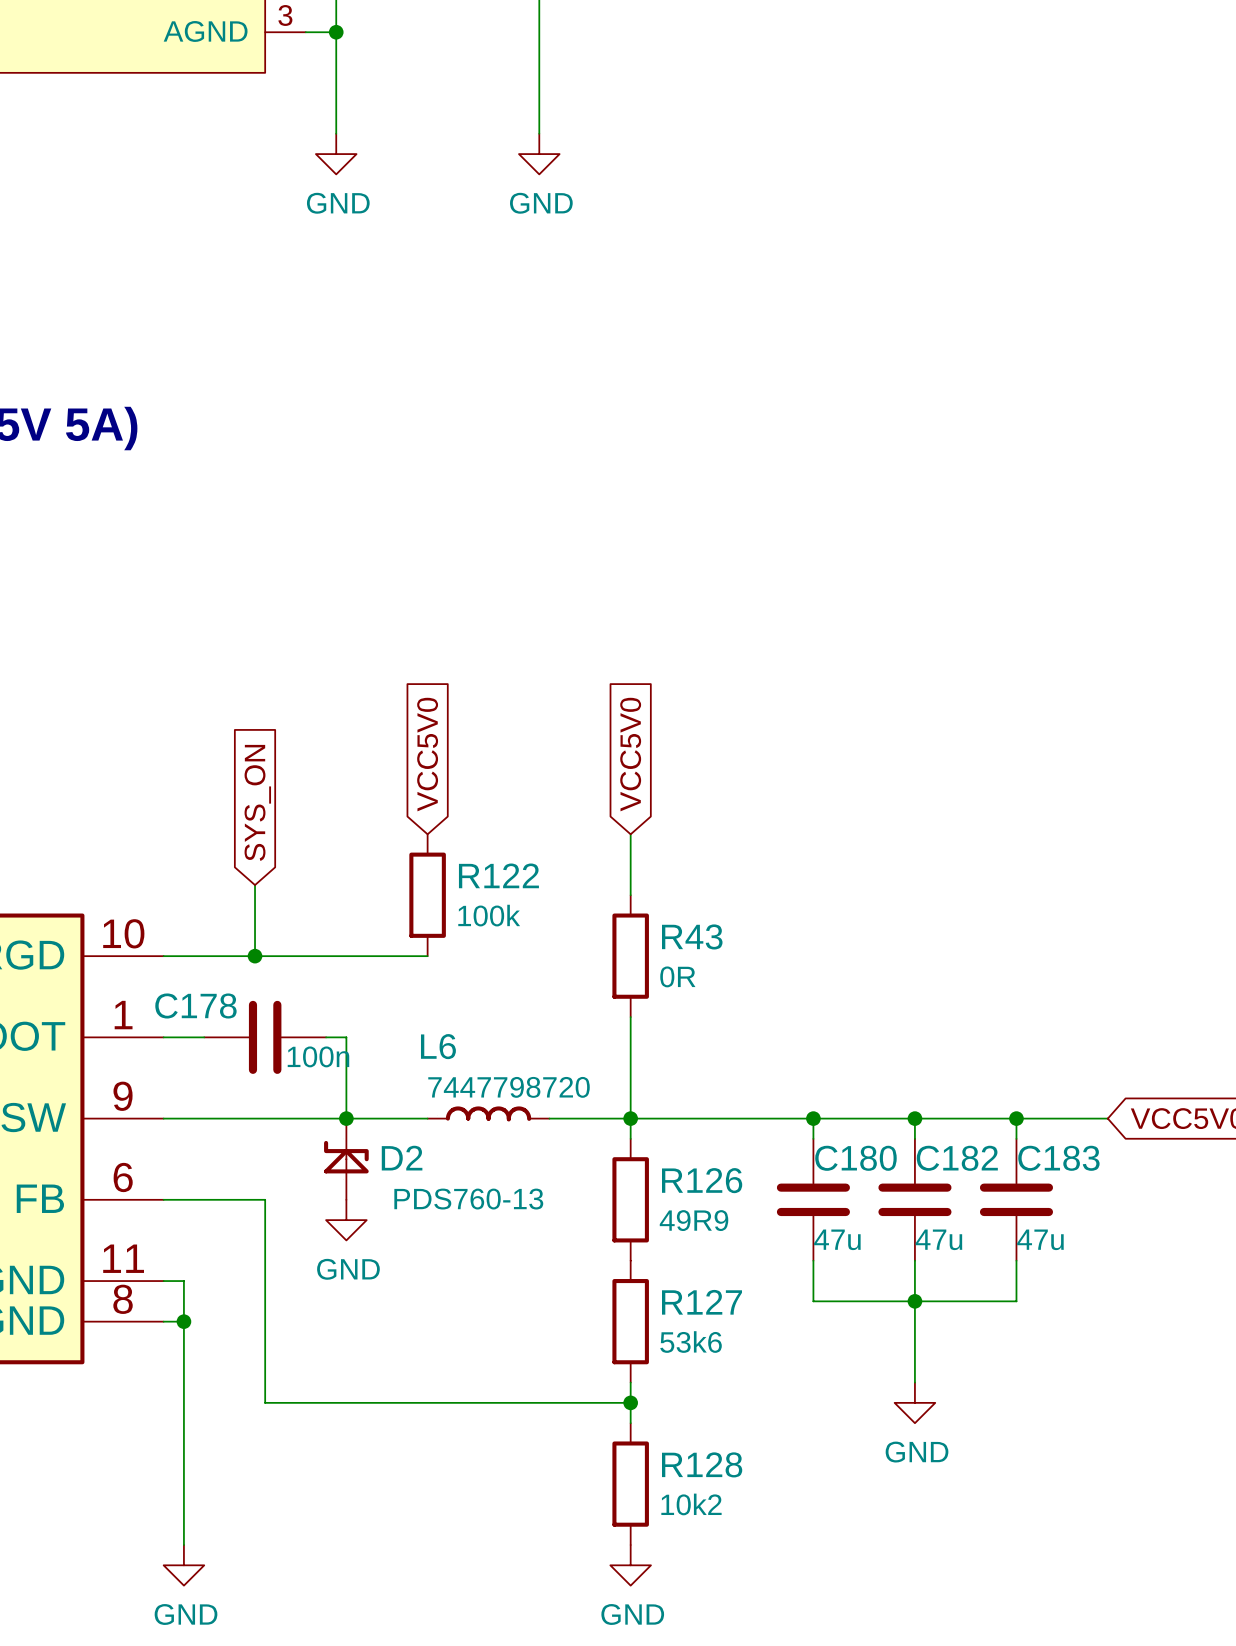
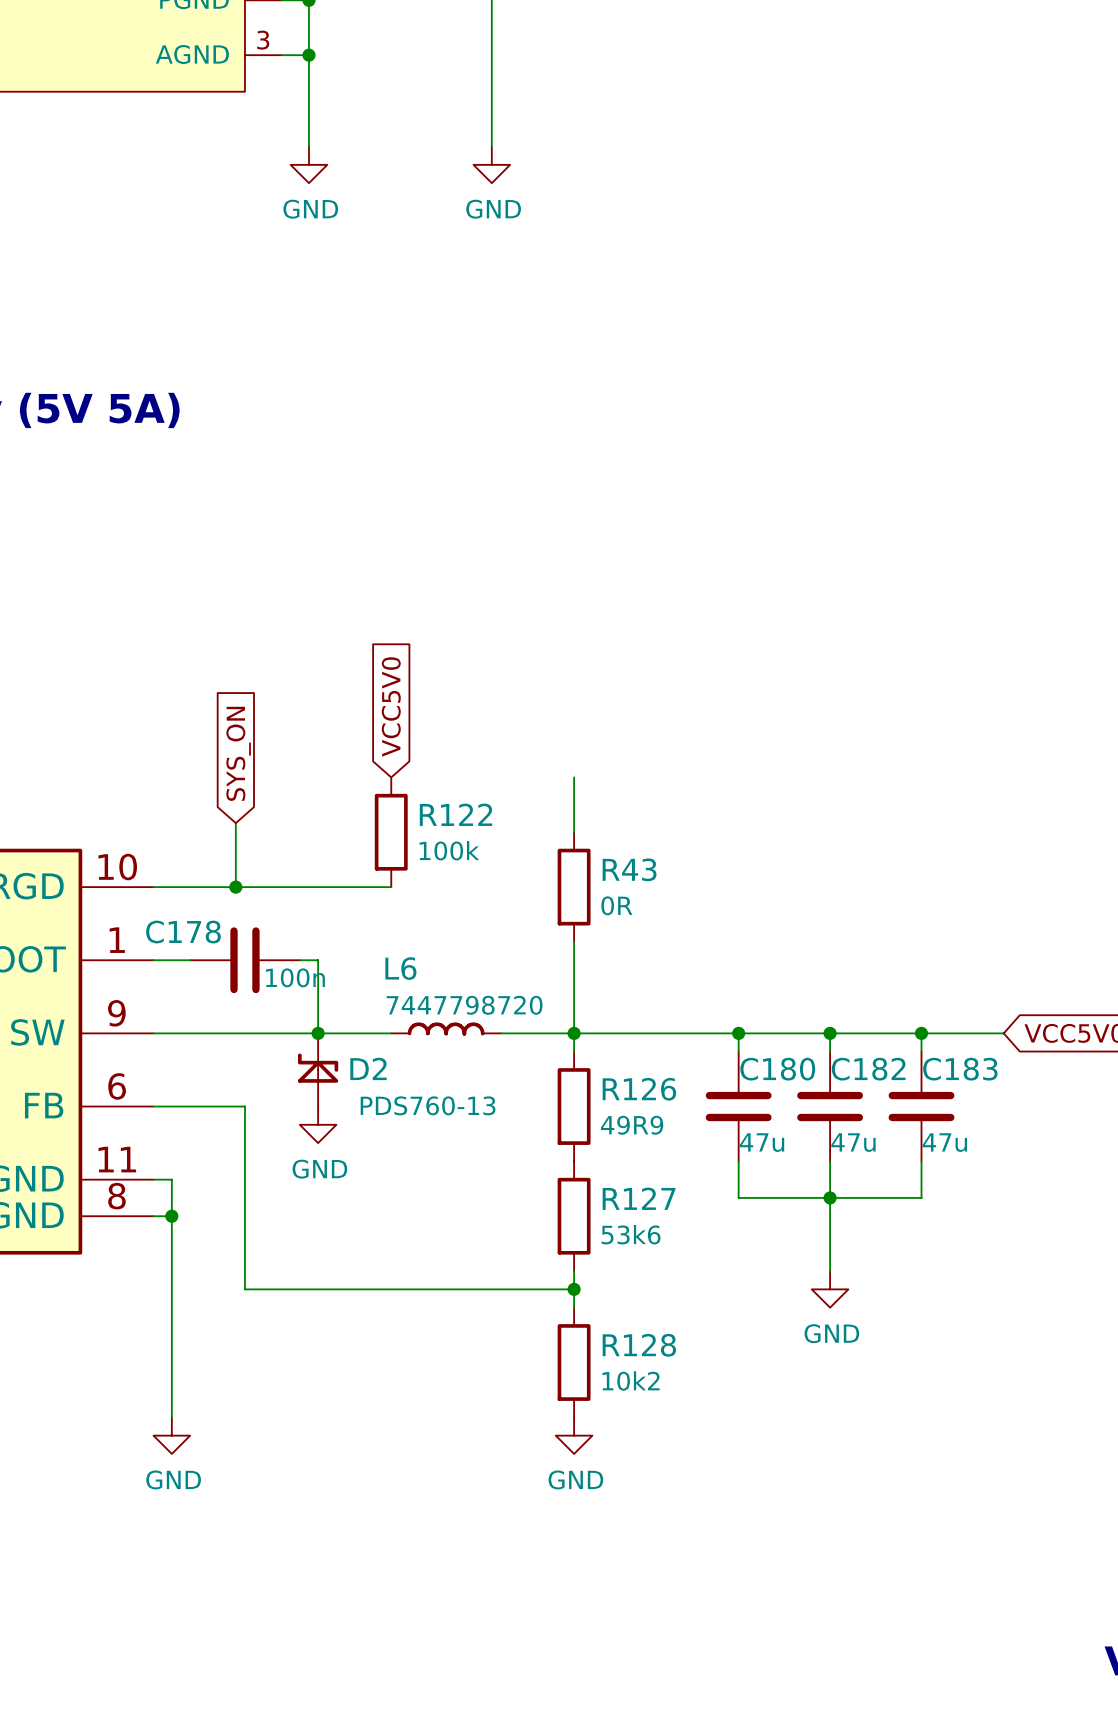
global label: VCC5V0 (630, 754) -> none

